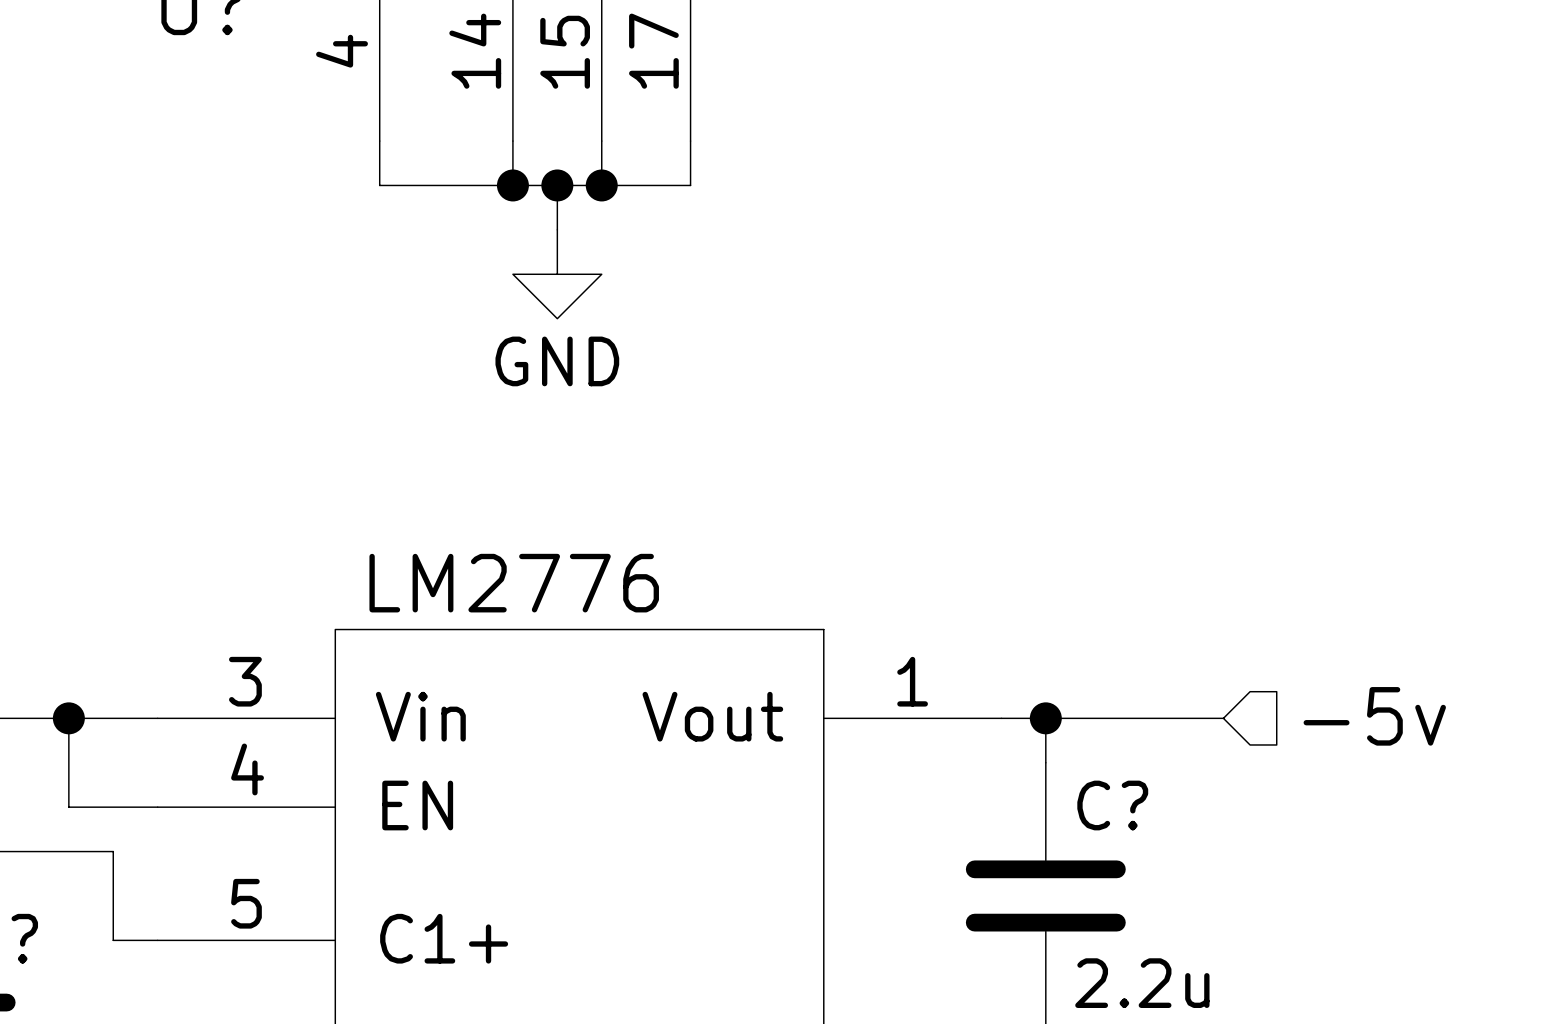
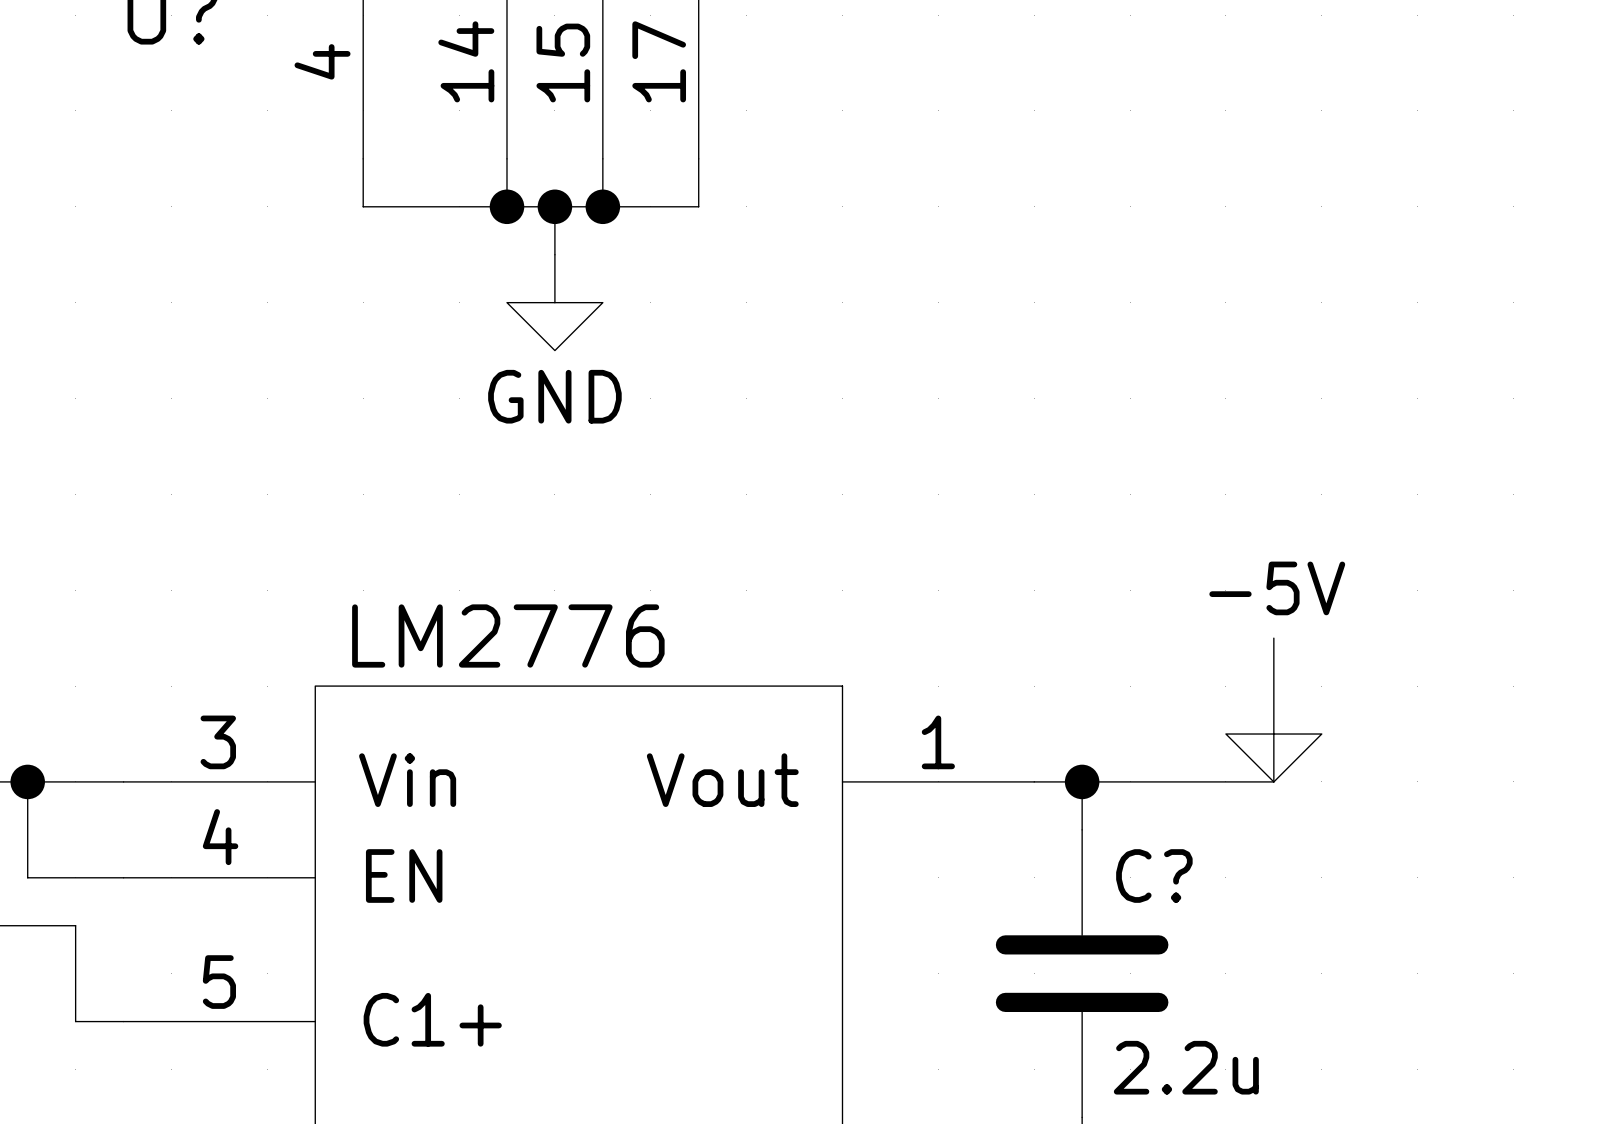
power symbol: none -> -5V (1273, 710)
wire: none -> (1273, 734) (1273, 781)
hierarchical label: -5v (1374, 716) -> none

